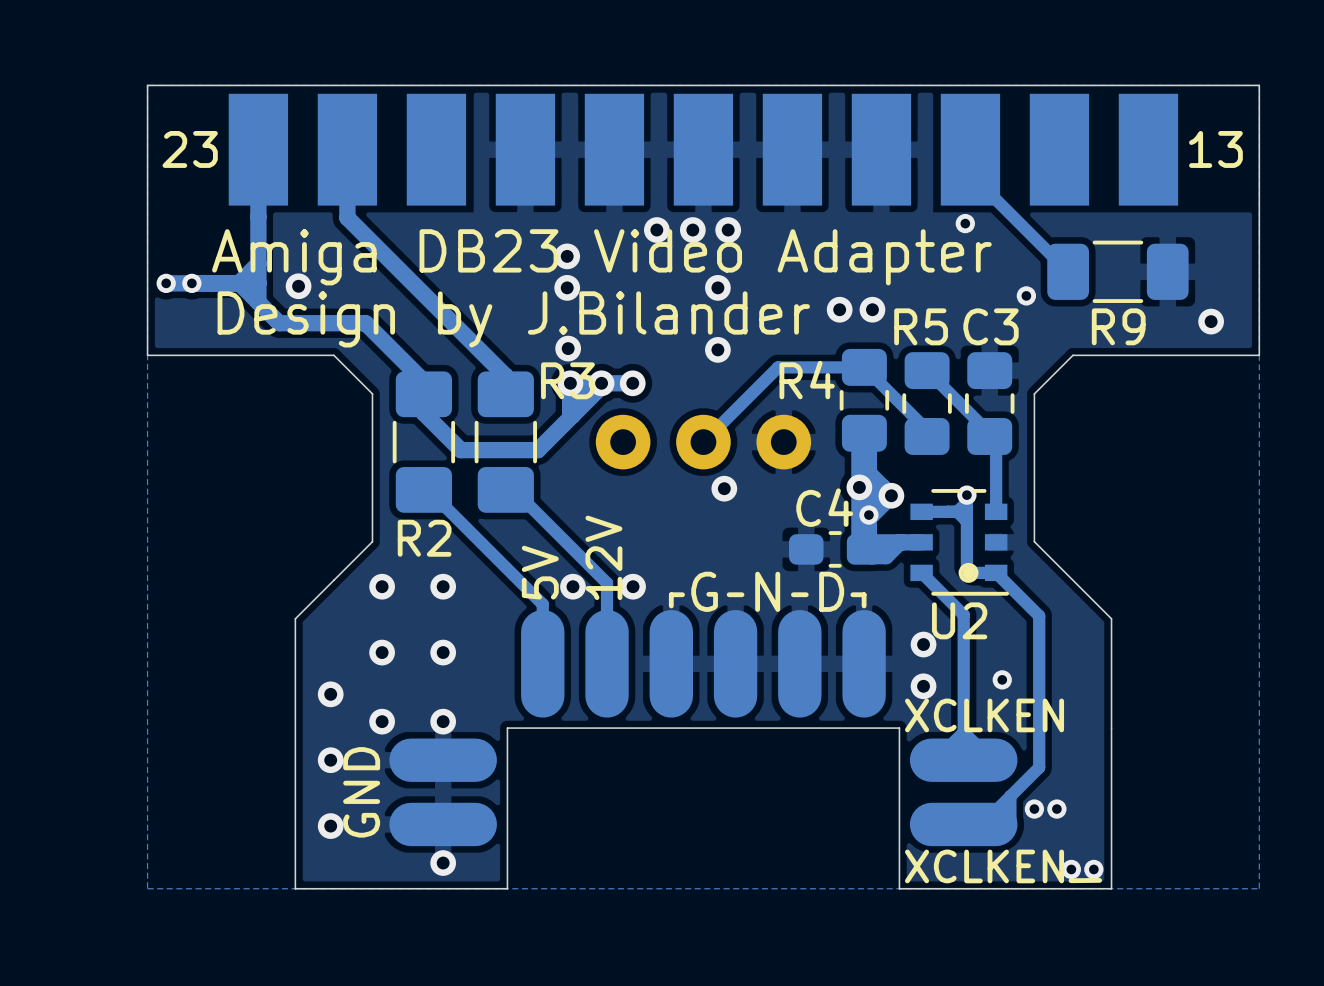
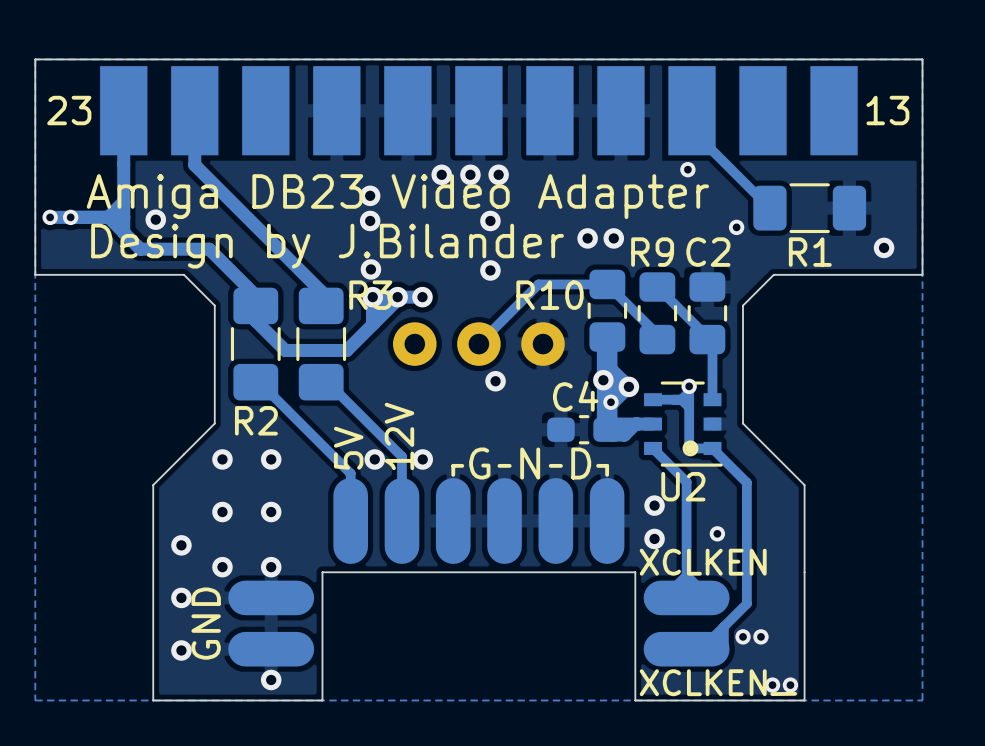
R5 name: R5 (921, 326) -> R9 (652, 252)
C3 name: C3 (991, 326) -> C2 (708, 252)
R9 name: R9 (1118, 326) -> R1 (810, 252)
R4 name: R4 (807, 380) -> R10 (550, 295)

